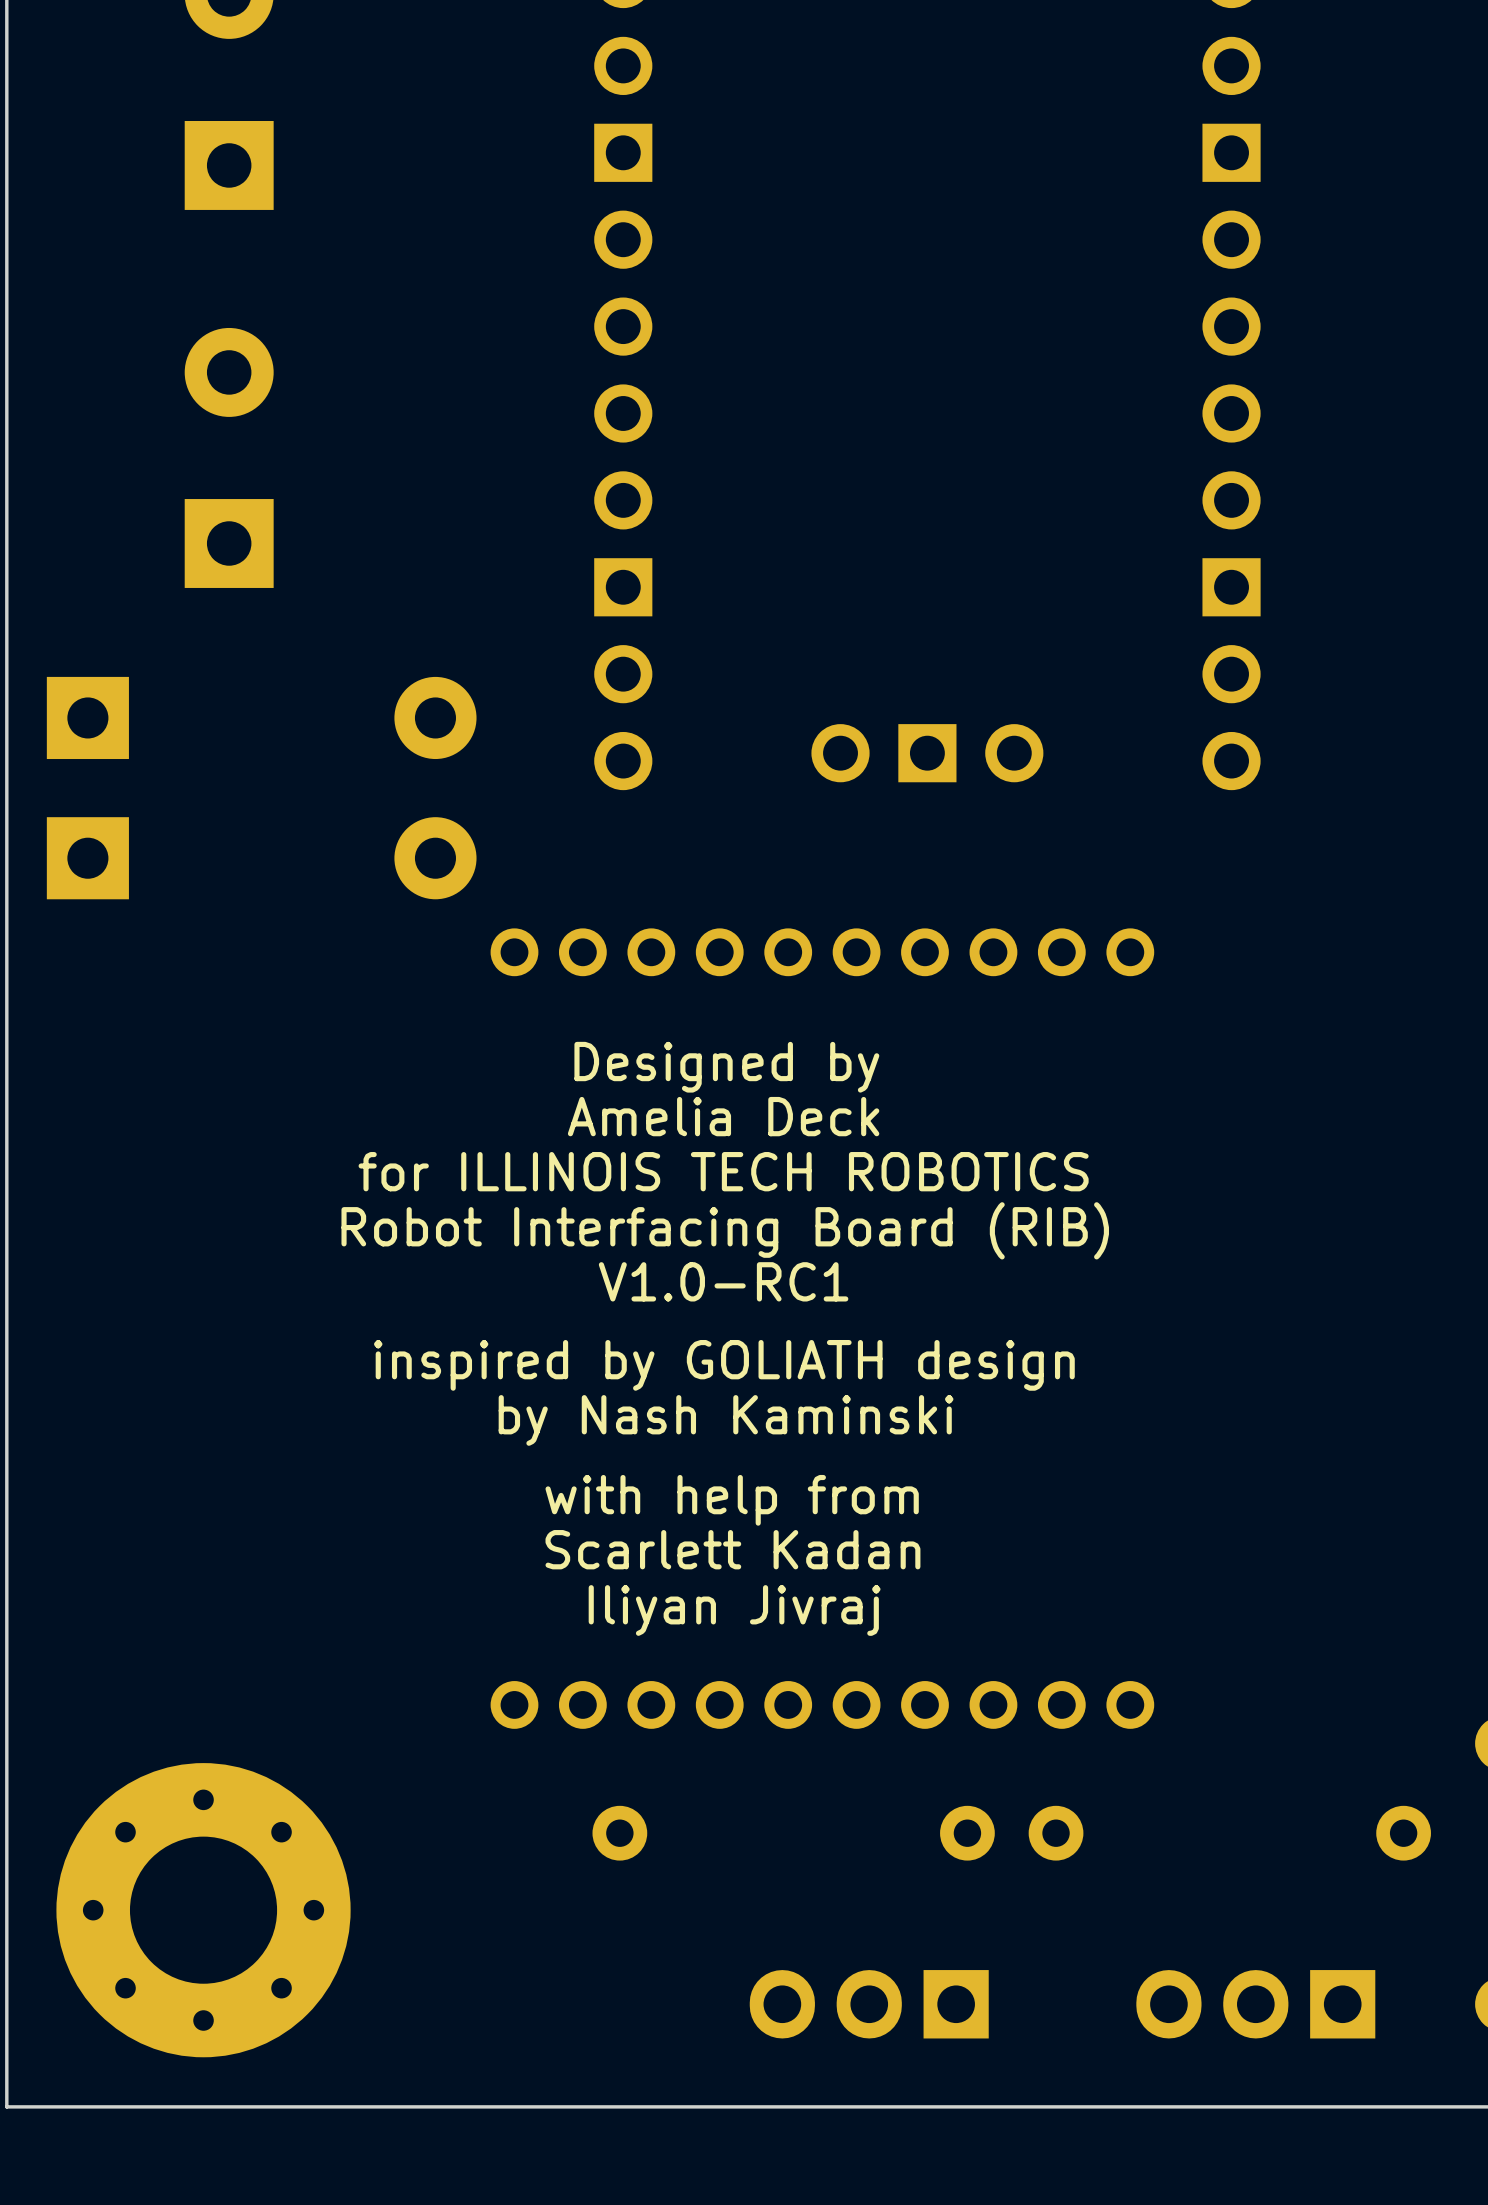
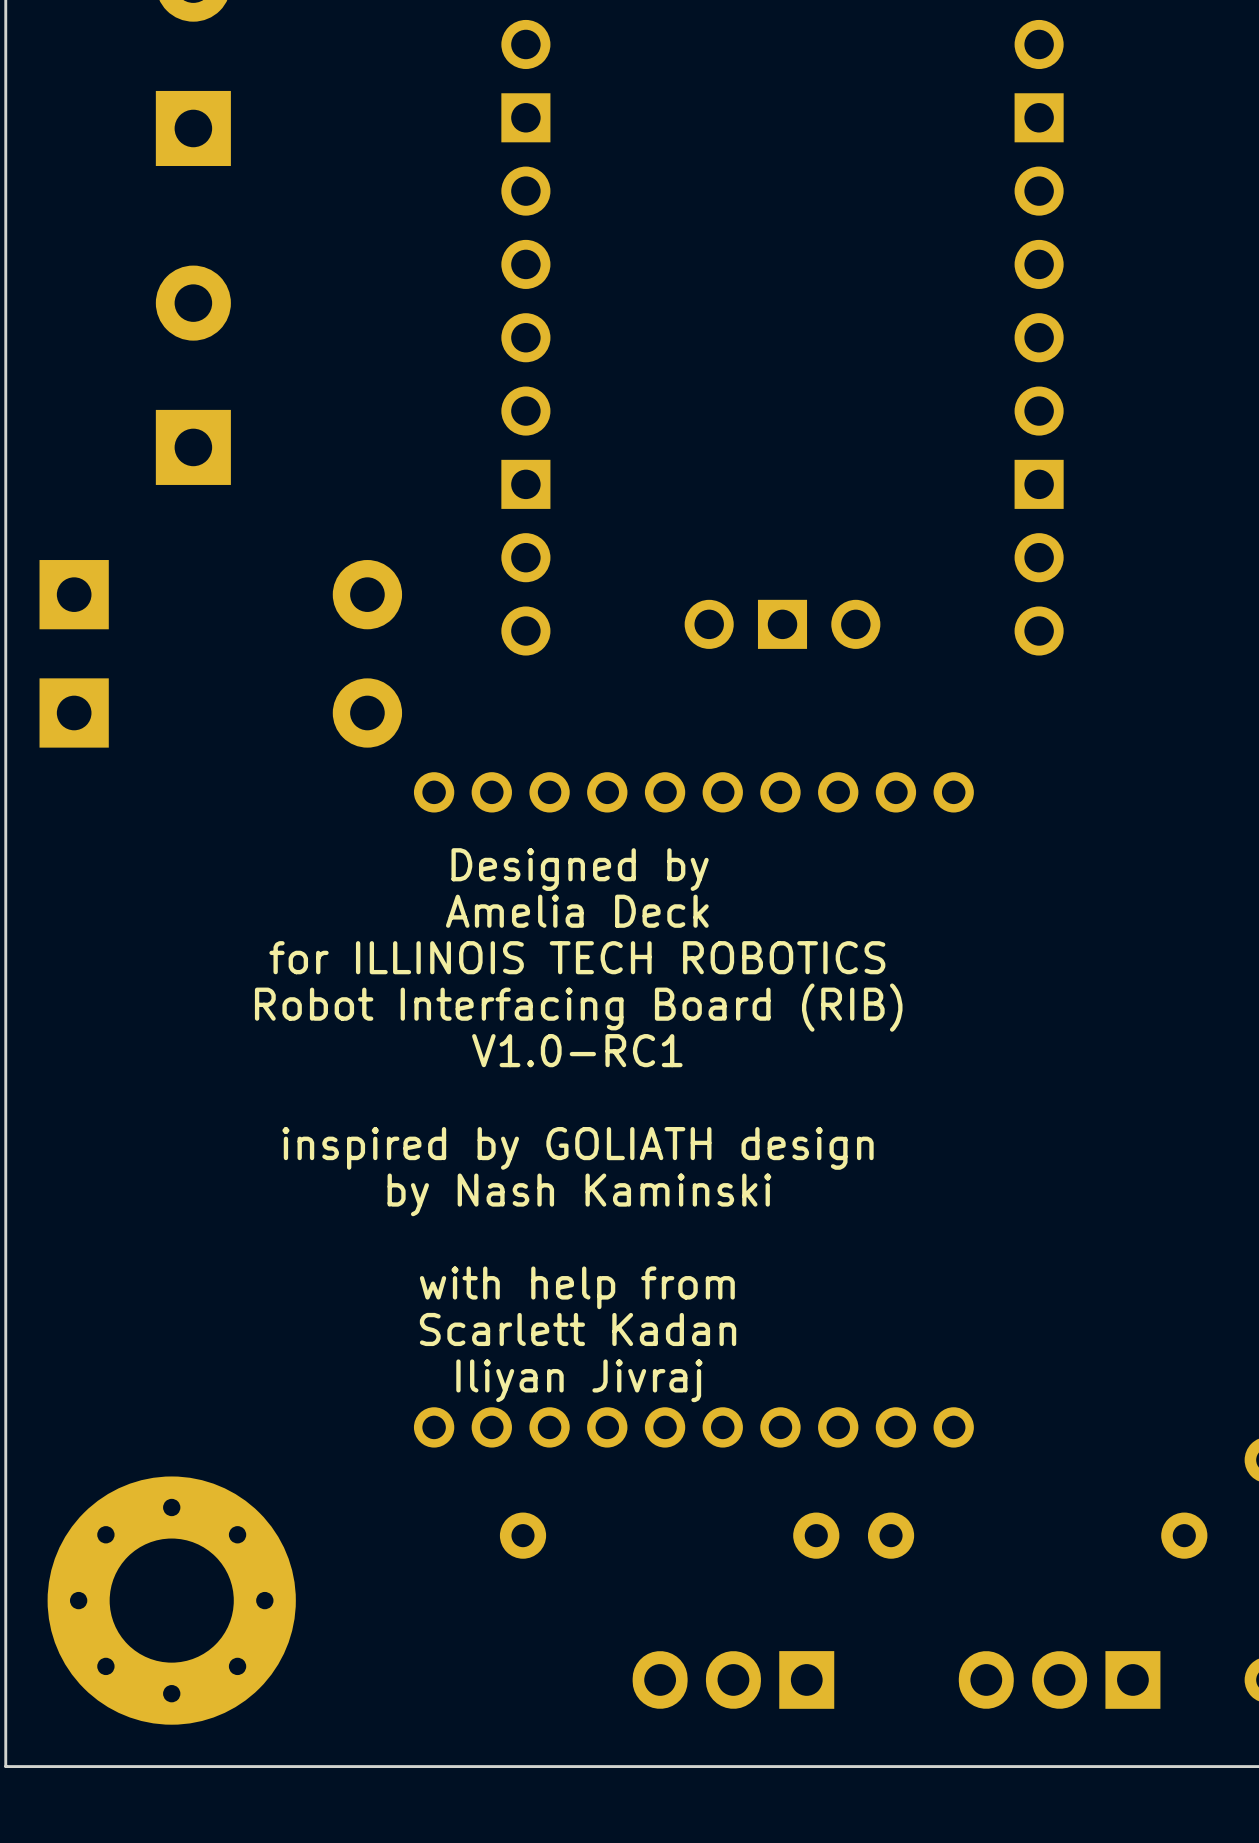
text position: Designed by (726, 1067) -> Designed by (580, 869)
text position: Amelia Deck (723, 1116) -> Amelia Deck (577, 911)
text position: for ILLINOIS TECH ROBOTICS (723, 1171) -> for ILLINOIS TECH ROBOTICS (577, 957)
text position: Robot Interfacing Board (RIB) (725, 1230) -> Robot Interfacing Board (RIB) (578, 1007)
text position: V1.0-RC1 (723, 1281) -> V1.0-RC1 (577, 1050)
text position: inspired by GOLIATH design (724, 1365) -> inspired by GOLIATH design (578, 1148)
text position: by Nash Kaminski (726, 1420) -> by Nash Kaminski (579, 1194)
text position: with help from (732, 1500) -> with help from (577, 1287)
text position: Scarlett Kadan (732, 1549) -> Scarlett Kadan (578, 1329)
text position: Iliyan Jivraj (734, 1610) -> Iliyan Jivraj (579, 1380)

